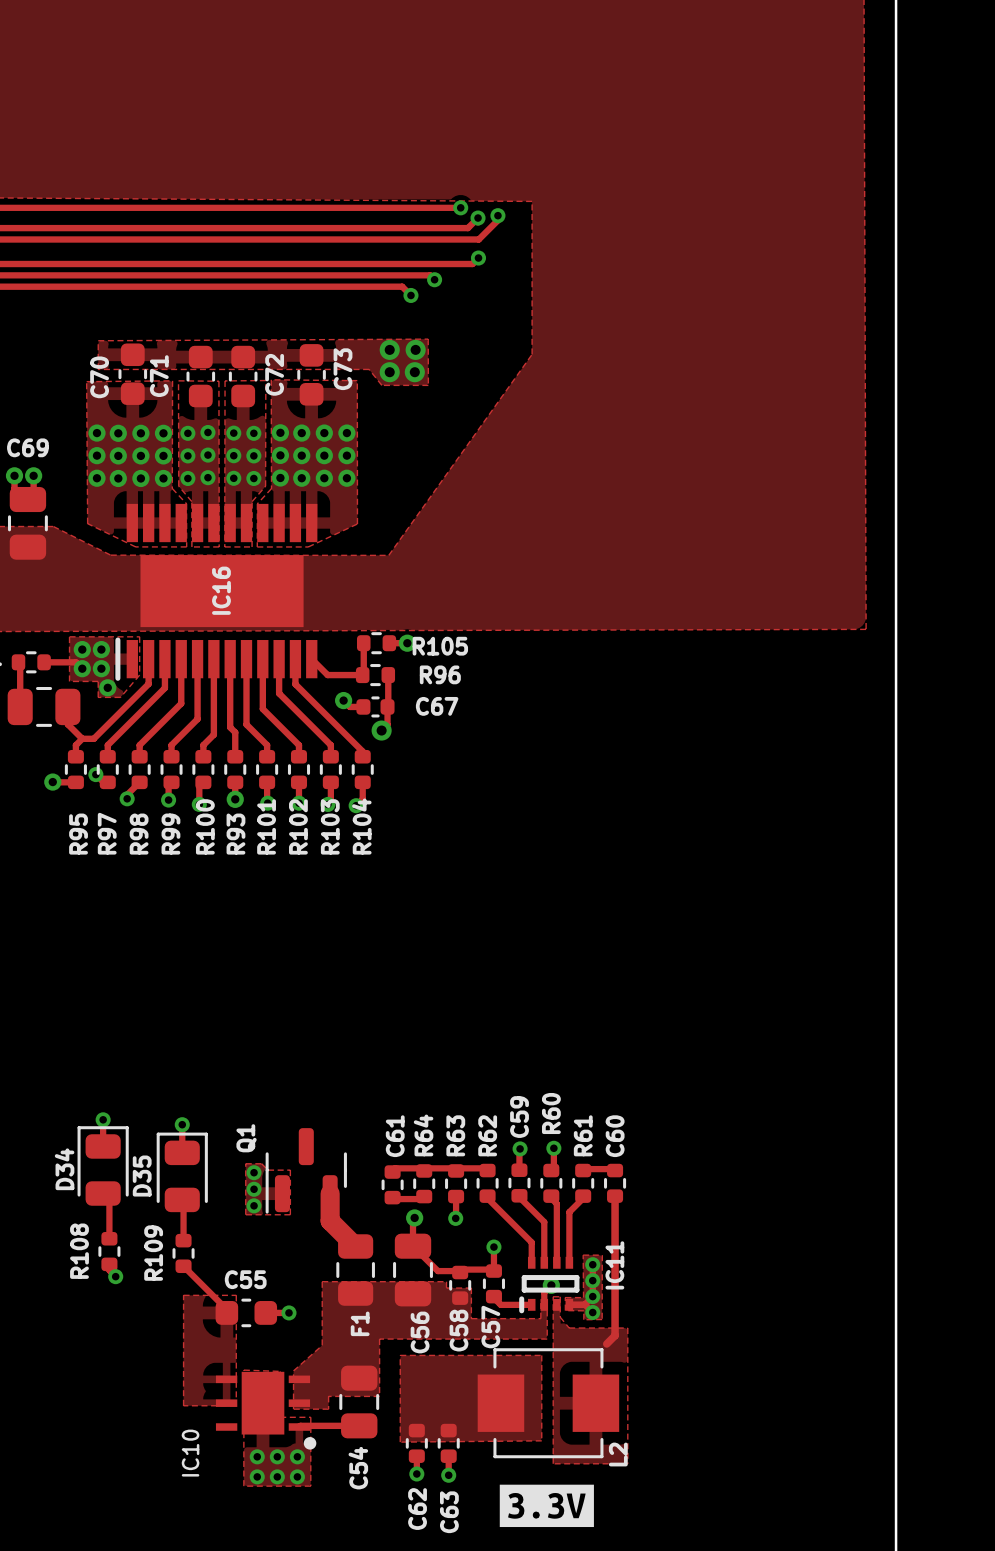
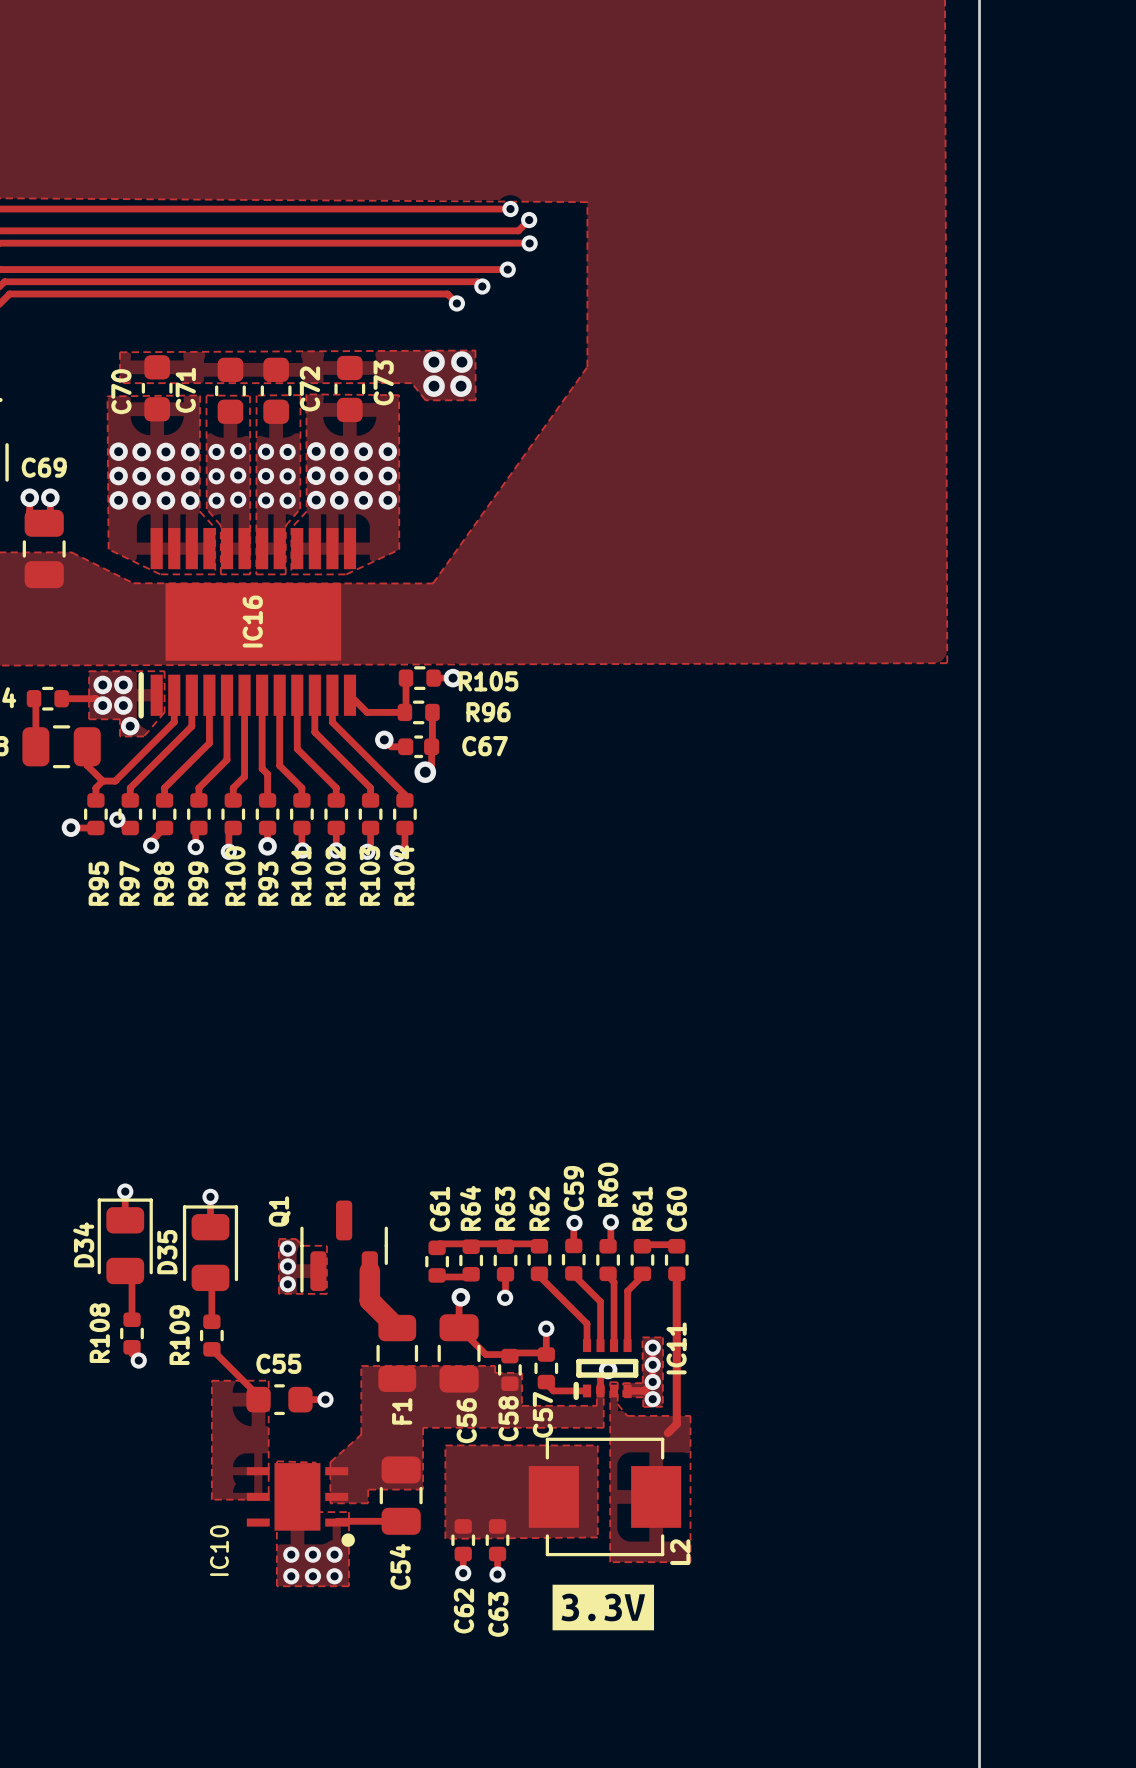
track: (497, 215) (497, 220) (478, 239) -> none
via: (497, 215) -> none
via: none -> (529, 243)
track: (478, 258) (472, 264) (458, 264) -> none
via: (478, 258) -> none
via: none -> (507, 269)

